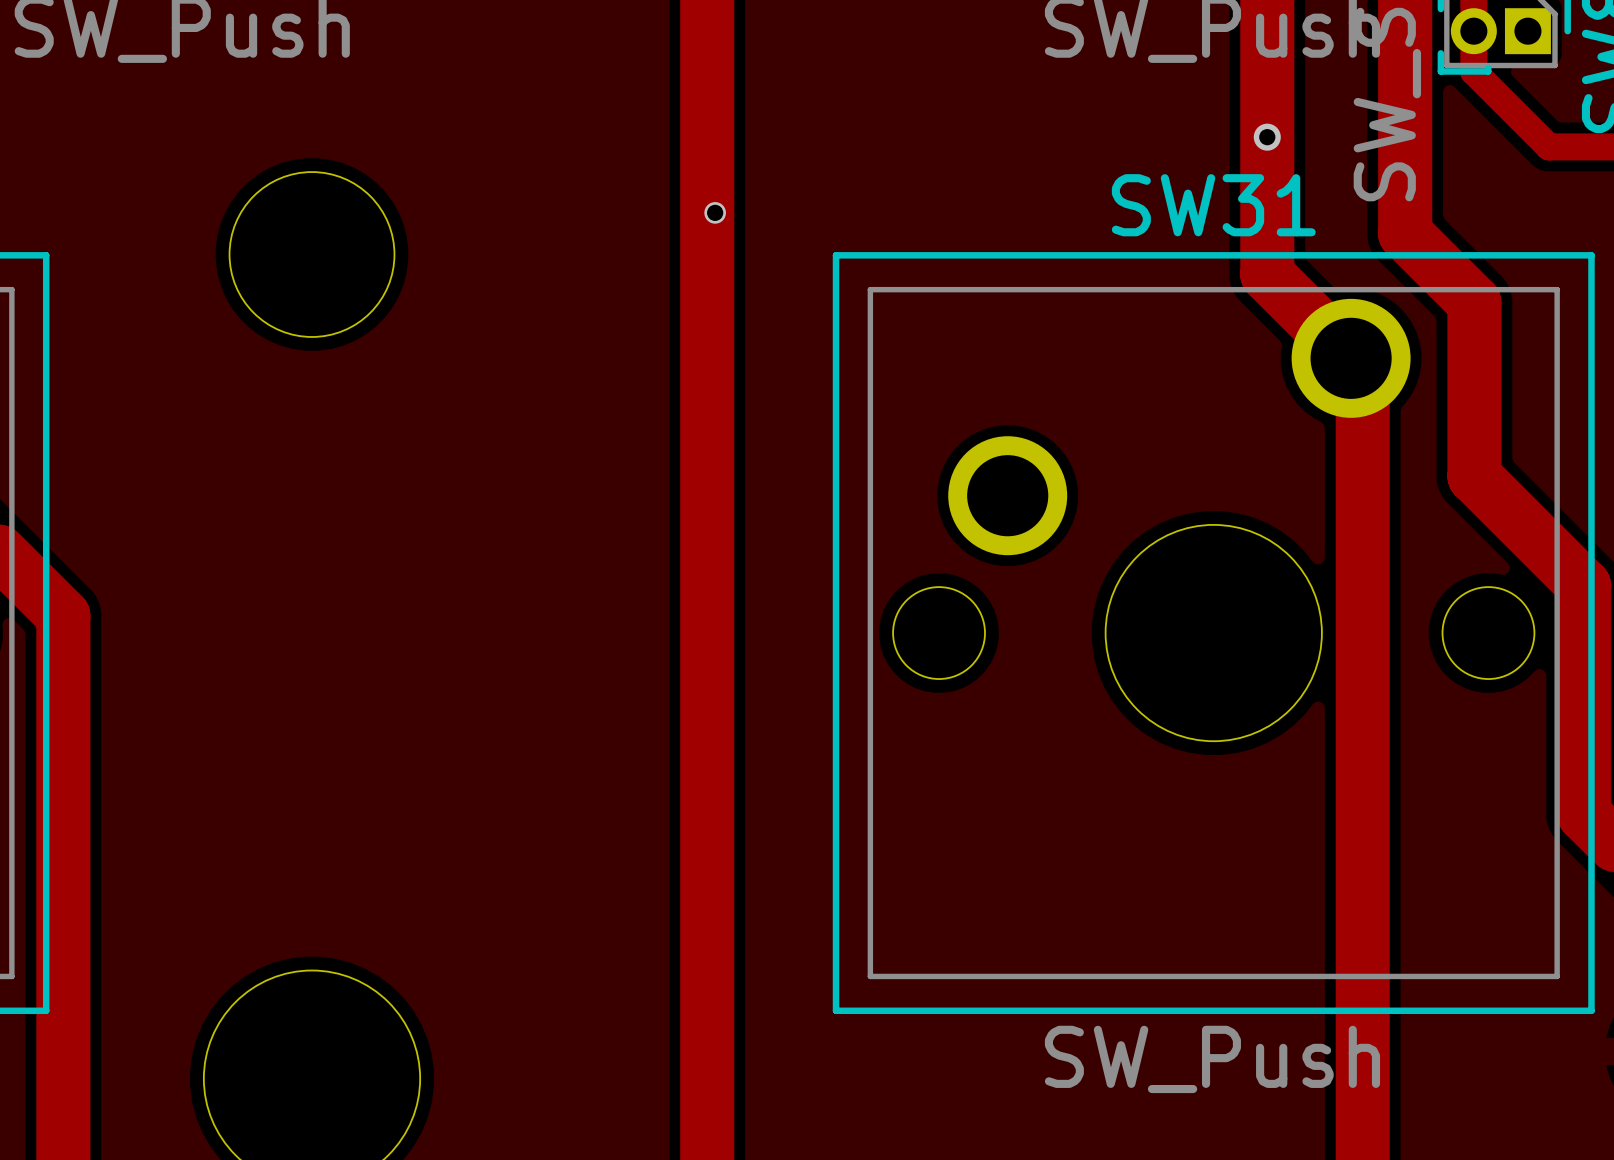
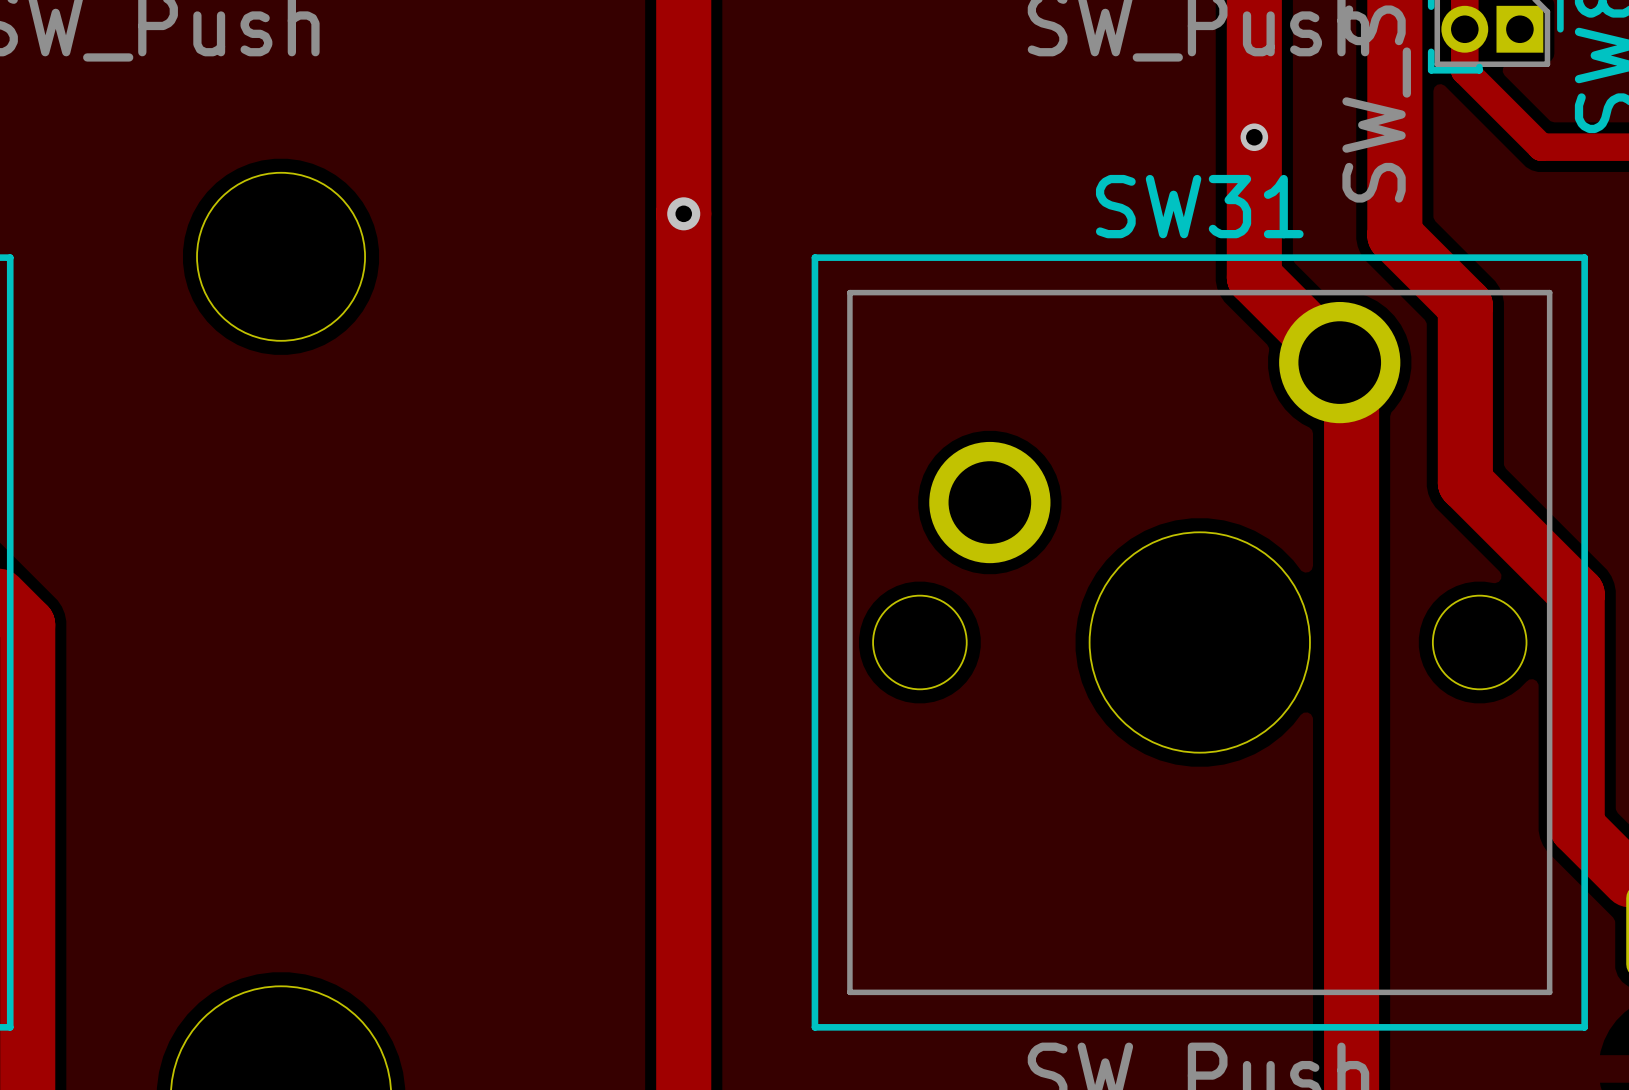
via size: [704, 202, 726, 224] -> [667, 197, 701, 231]

